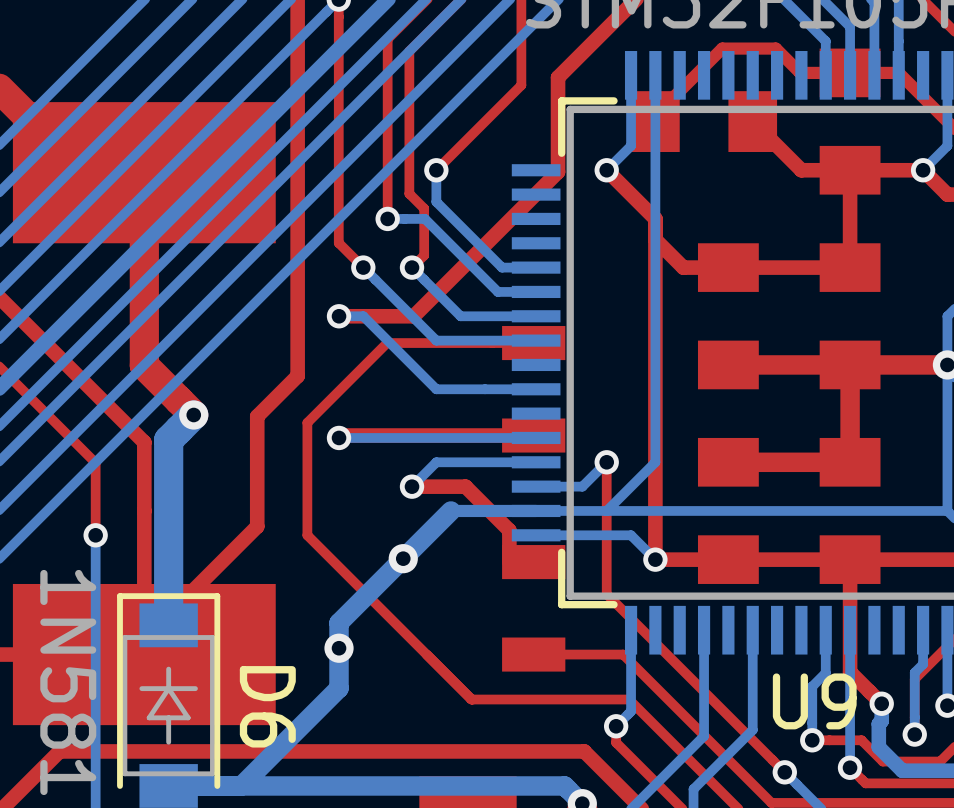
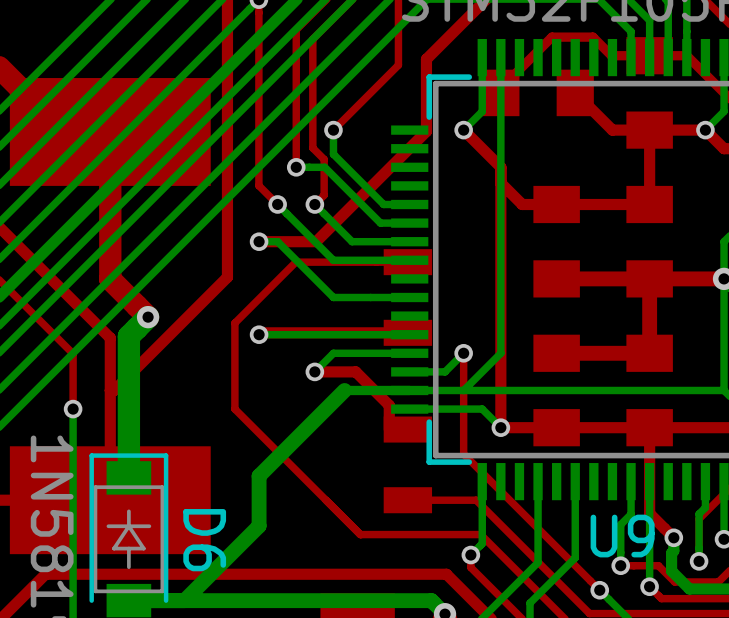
top track: (297, 362) (297, 376) (257, 416) (257, 526) (144, 639) -> (227, 277) (114, 390) (110, 390)
via: (403, 558) -> none
via: (339, 648) -> none

